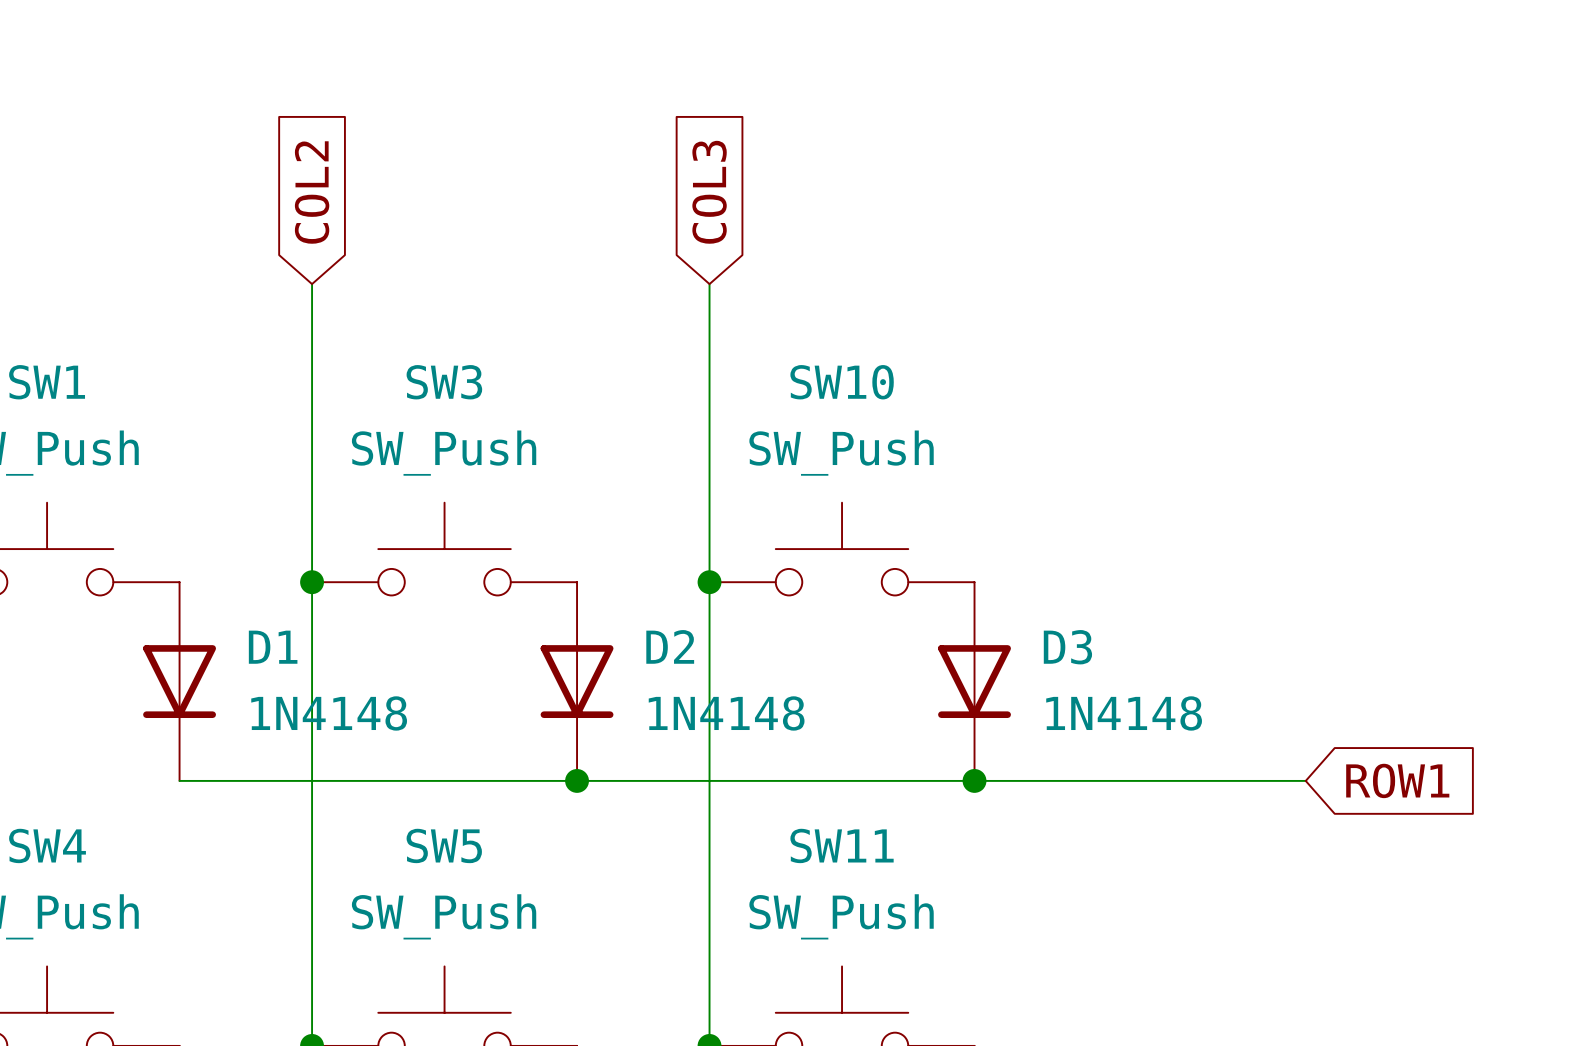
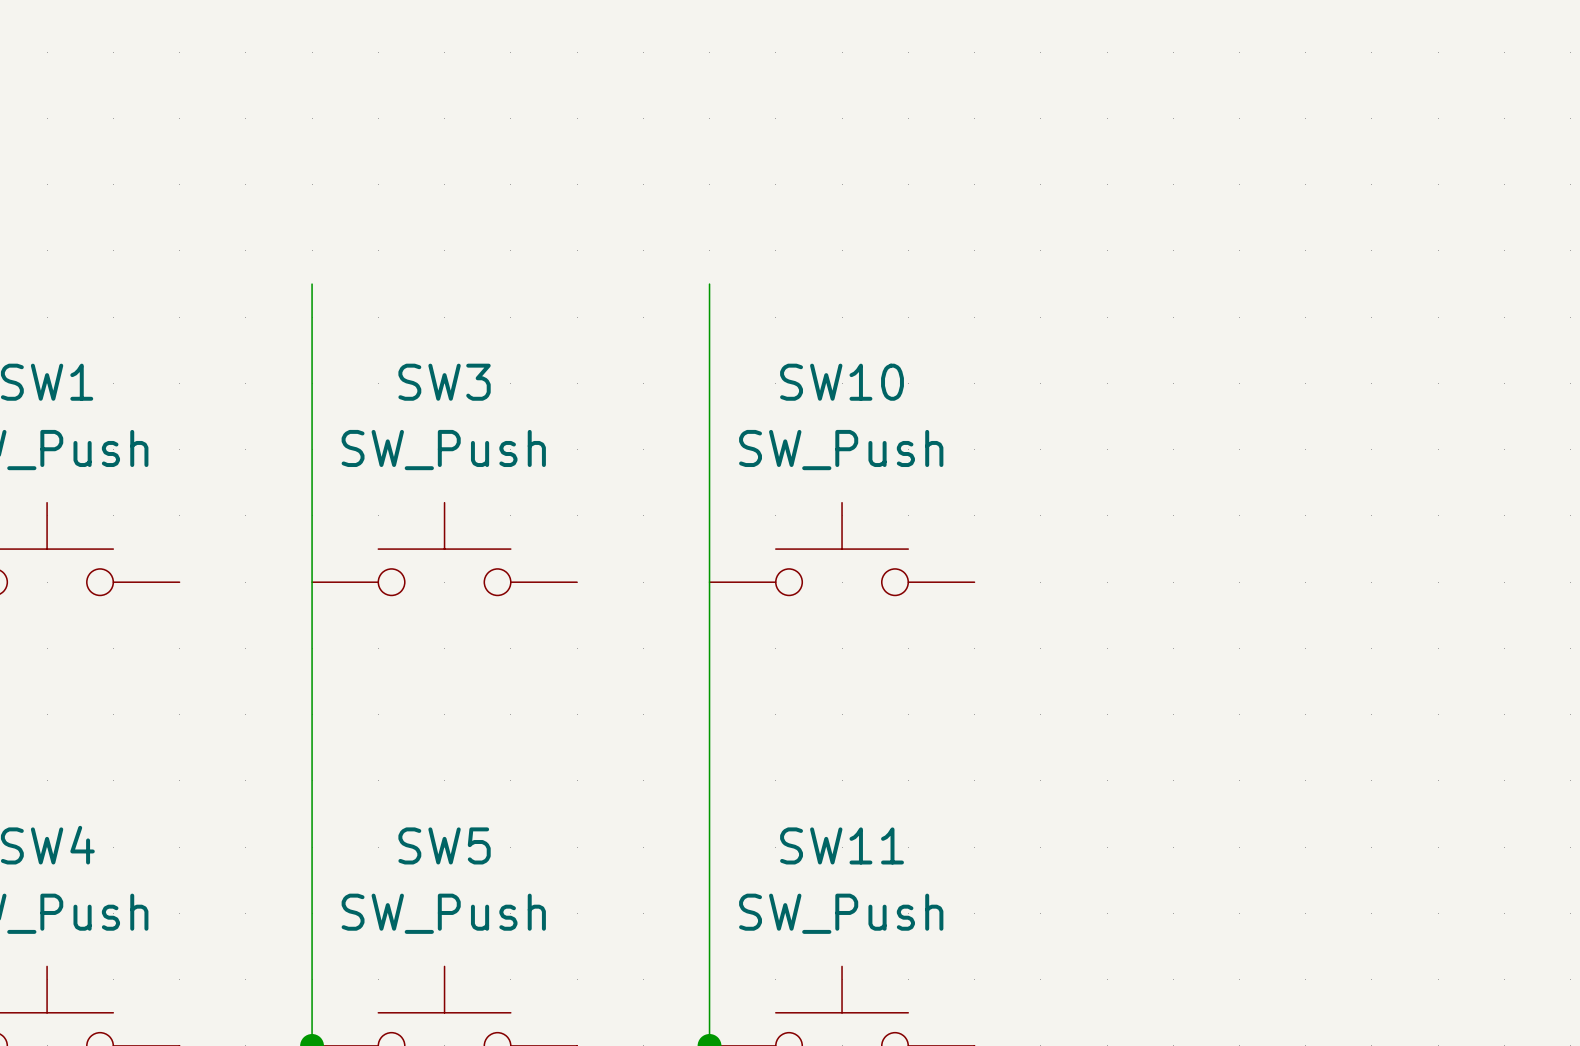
global label: COL2 (312, 192) -> none
global label: COL3 (709, 192) -> none
junction: (312, 582) -> none
junction: (709, 582) -> none
D1: 1N4148 (179, 681) -> none
D2: 1N4148 (577, 681) -> none
D3: 1N4148 (974, 681) -> none
wire: (179, 780) (1305, 780) -> none
junction: (577, 780) -> none
junction: (974, 780) -> none
global label: ROW1 (1397, 780) -> none

